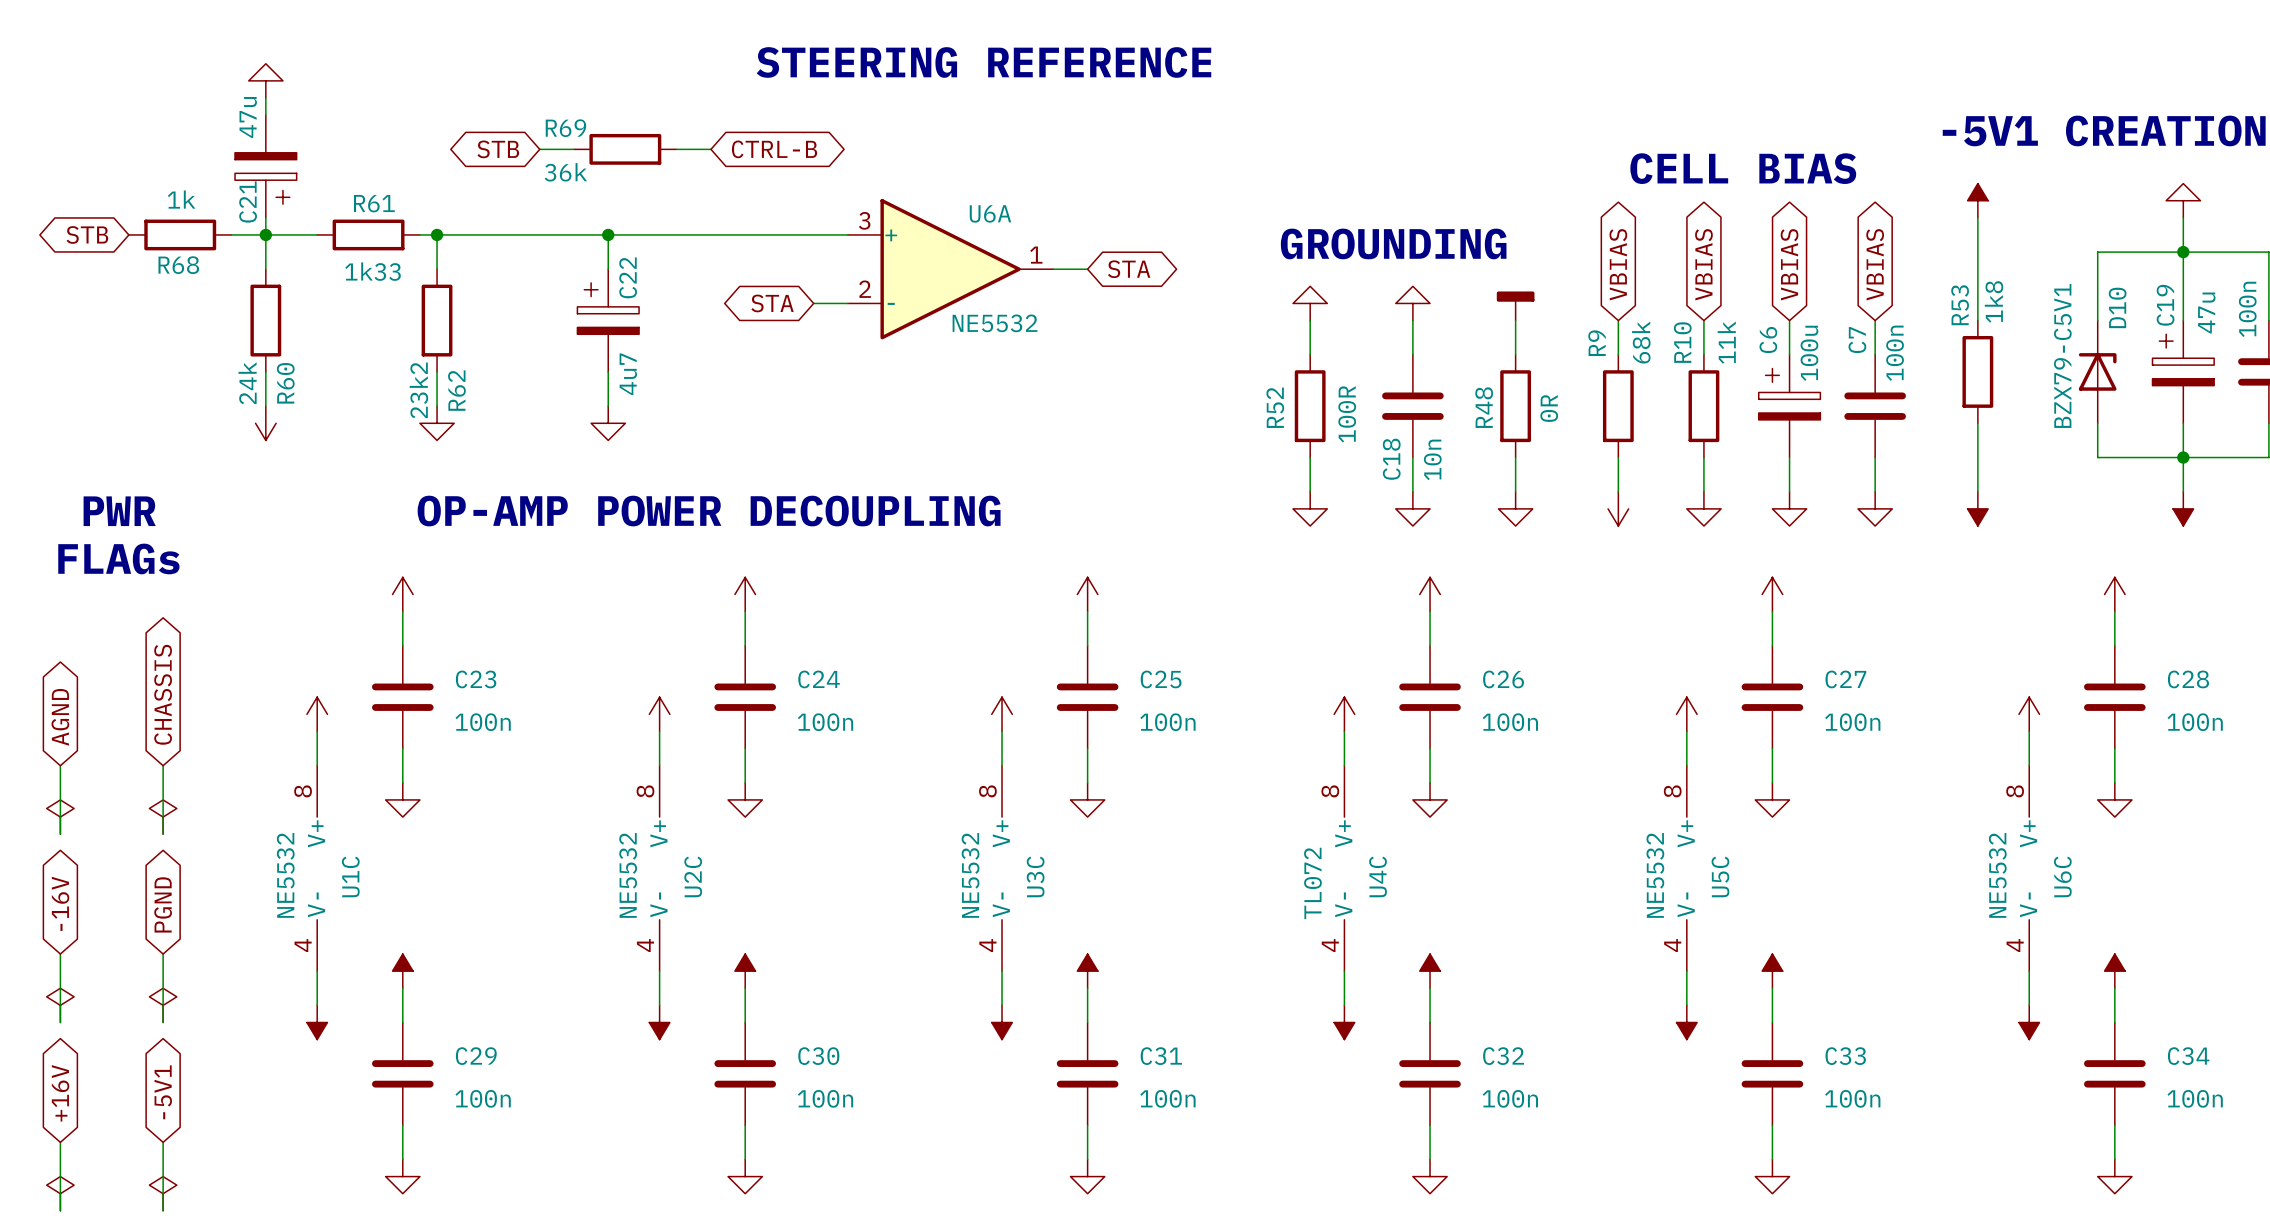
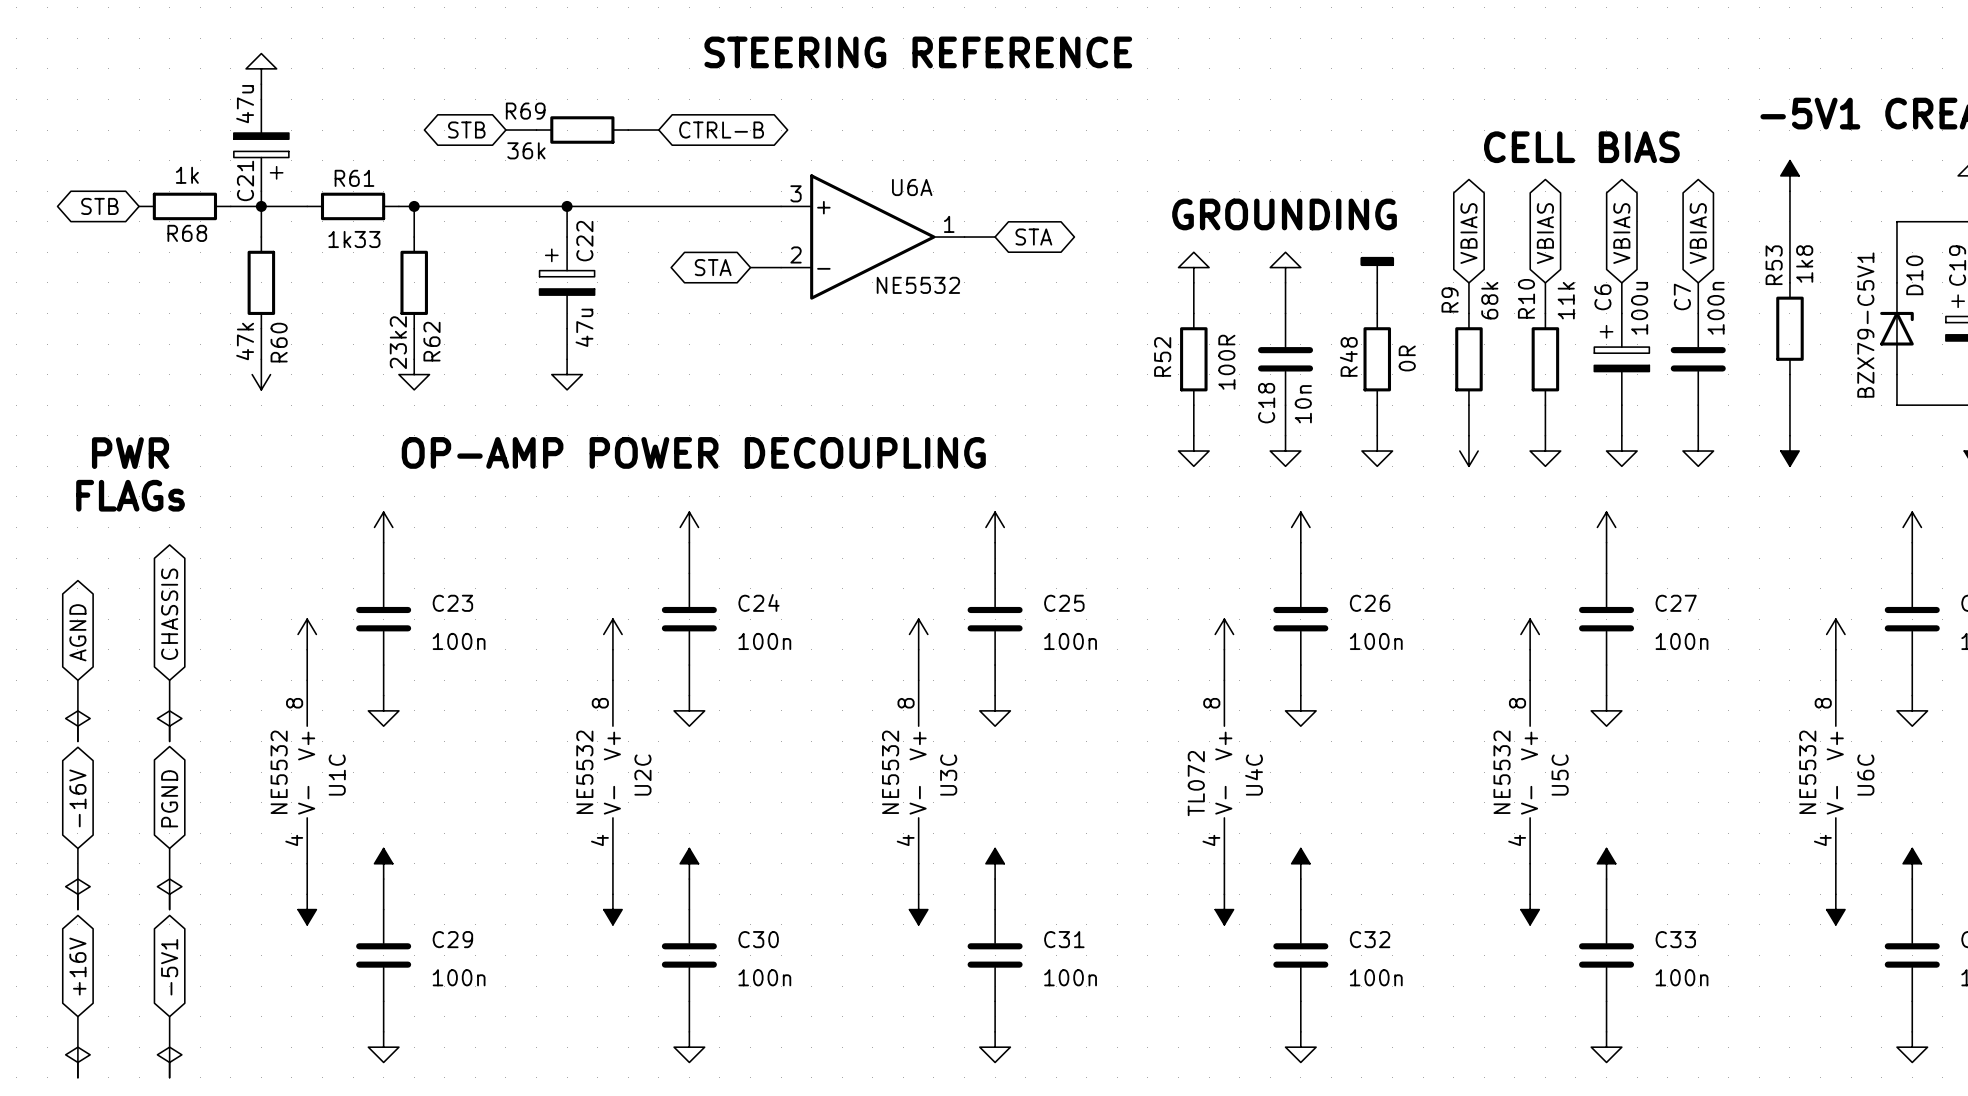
C22 value: 4u7 (628, 374) -> 47u (584, 327)
R60 value: 24k (247, 383) -> 47k (245, 341)

